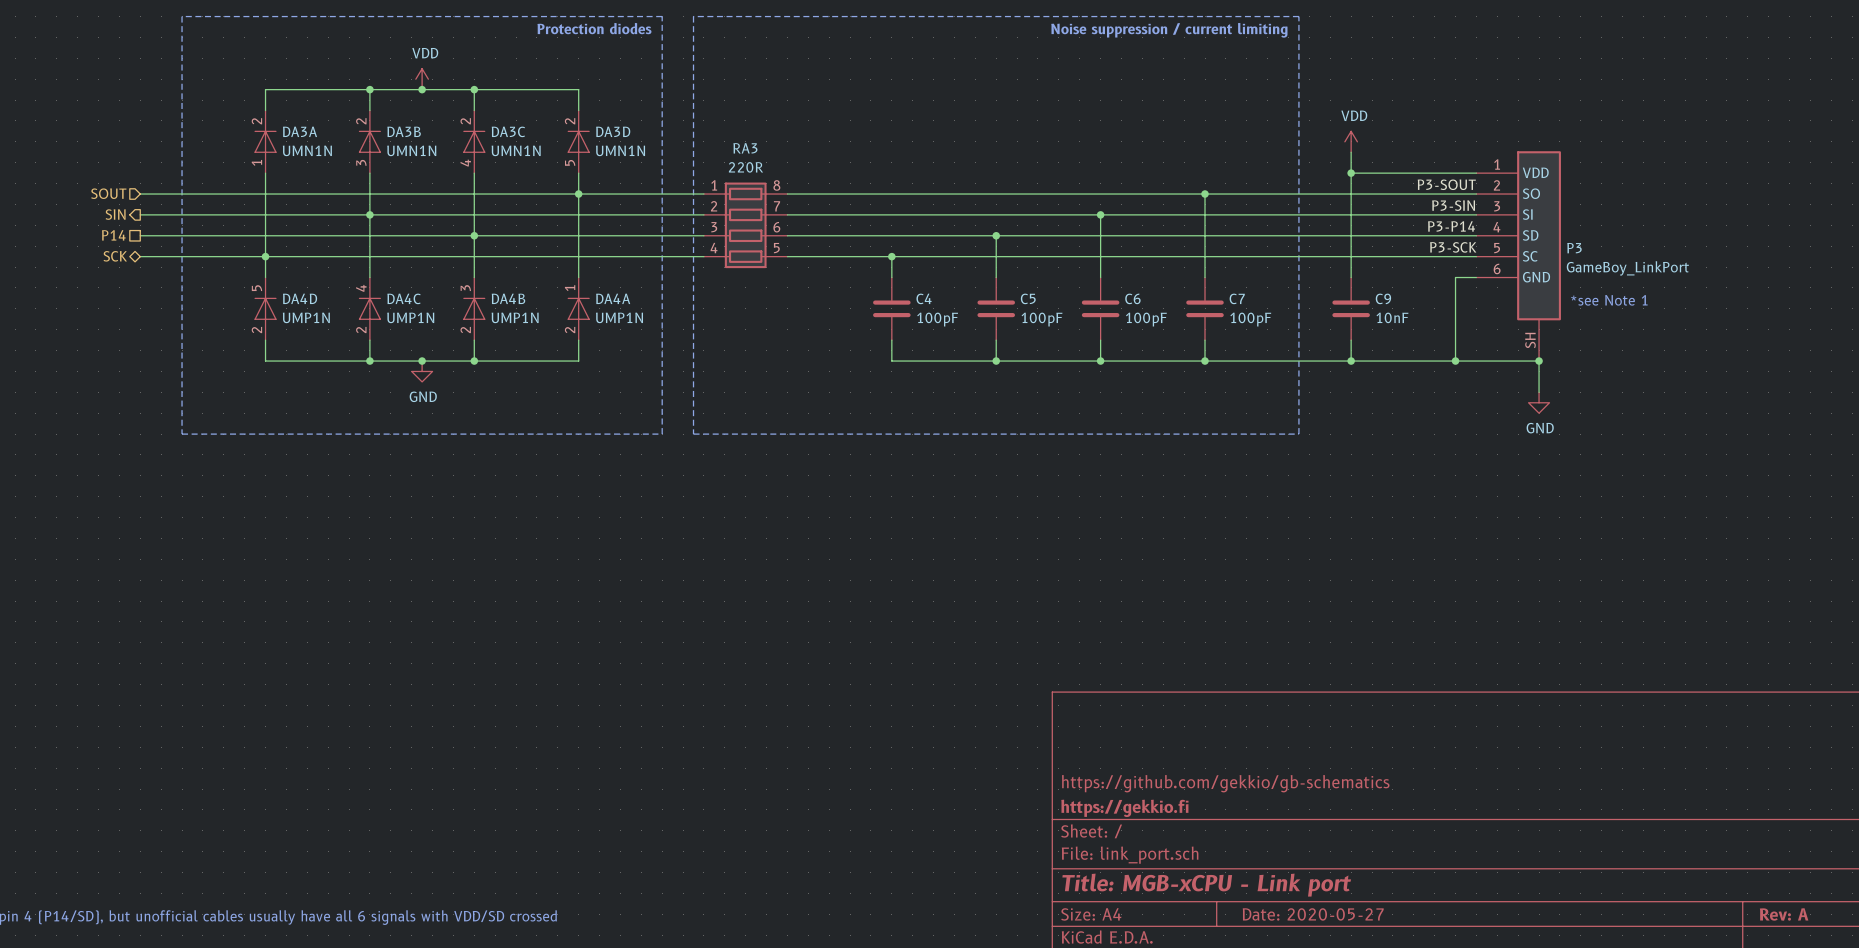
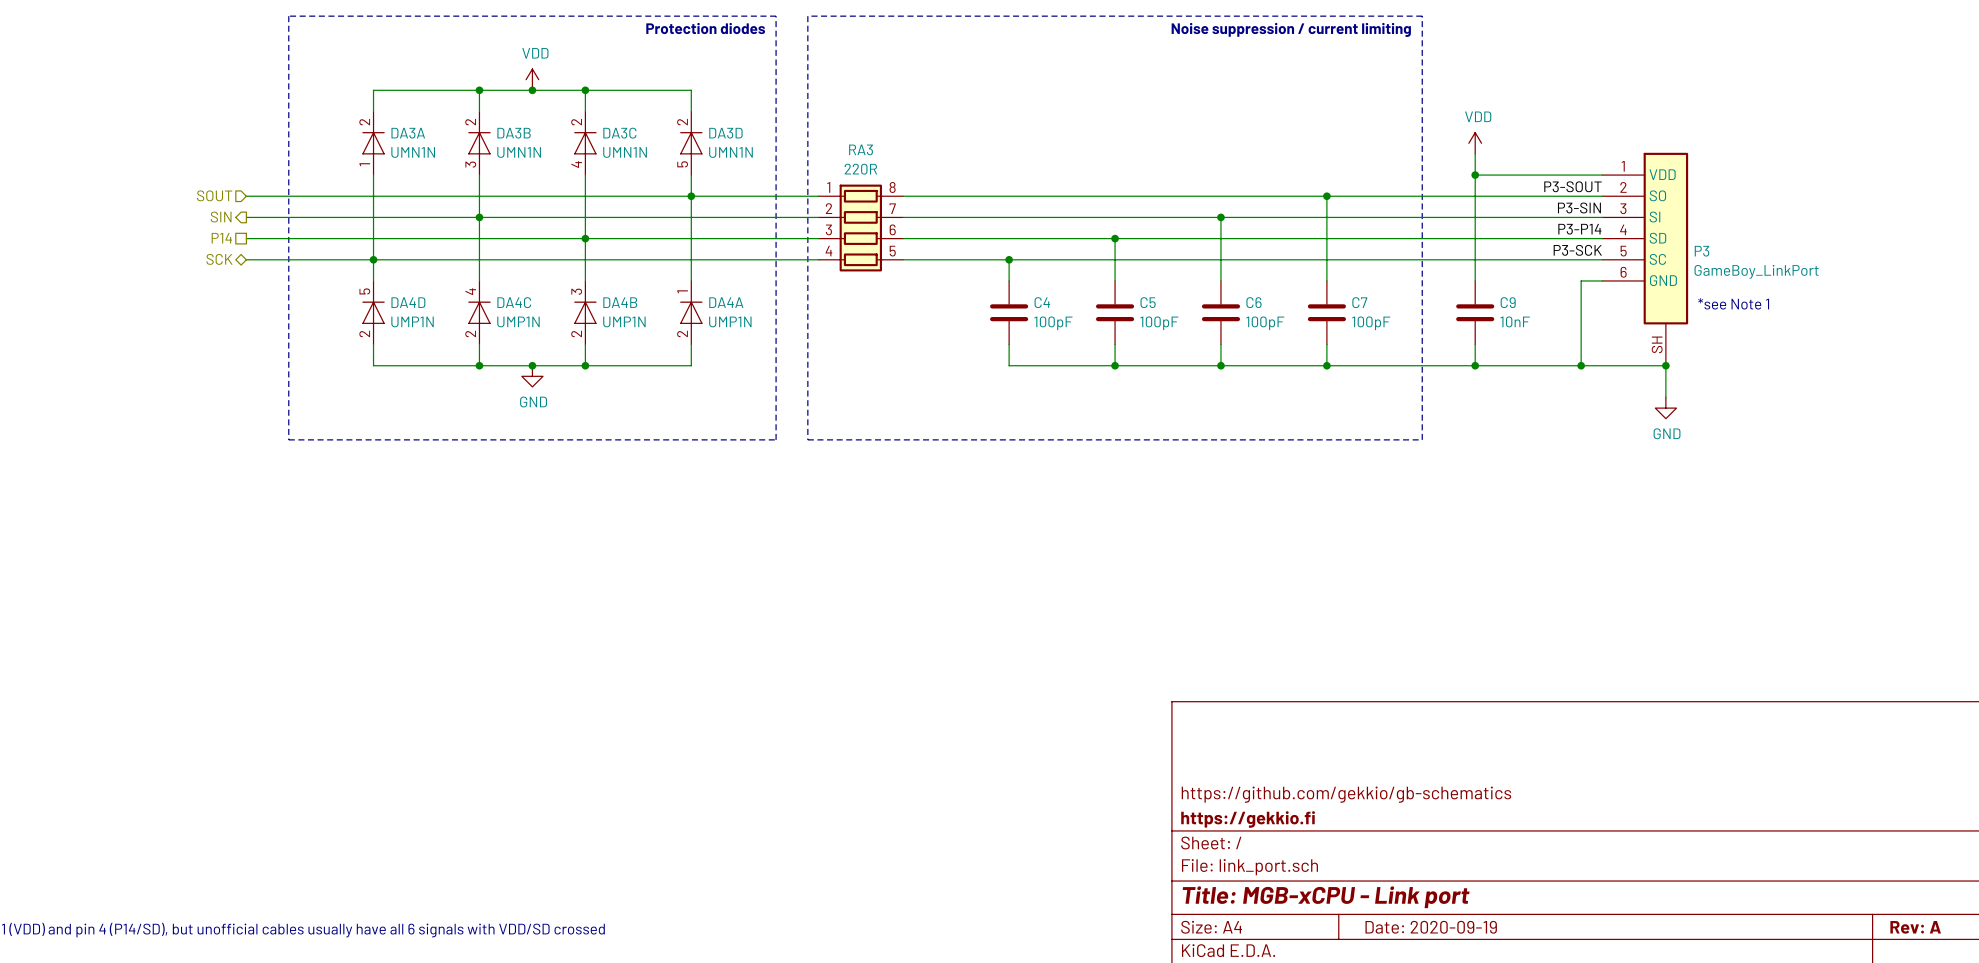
title block: Date: 2020-05-27 (1313, 914) -> Date: 2020-09-19 (1431, 927)

